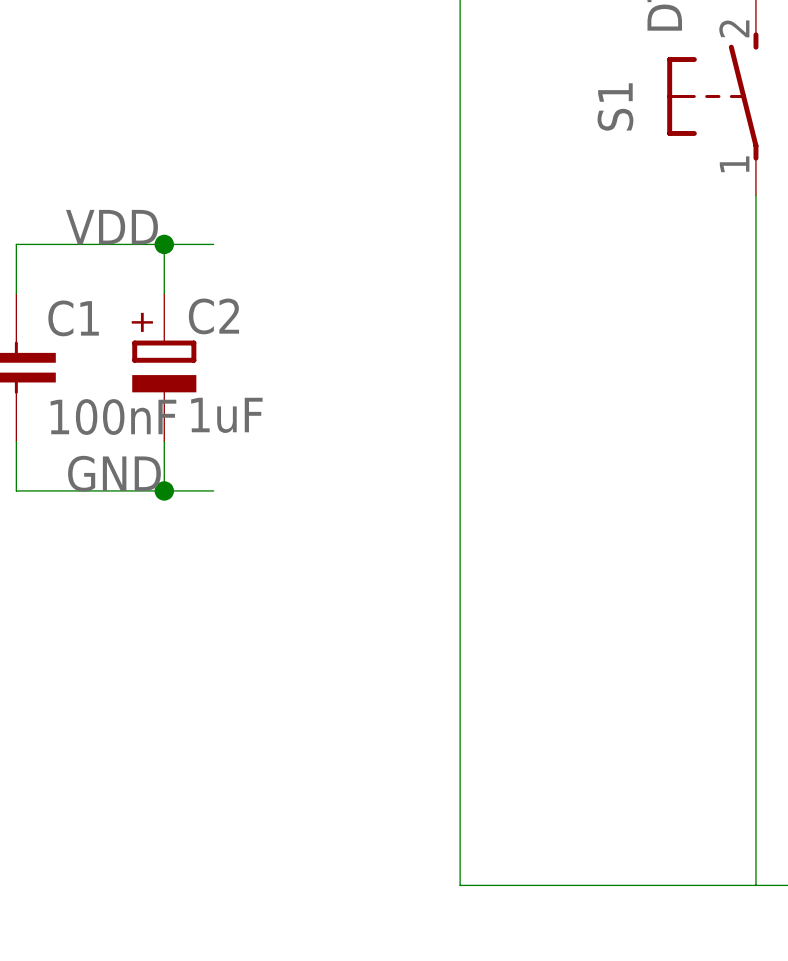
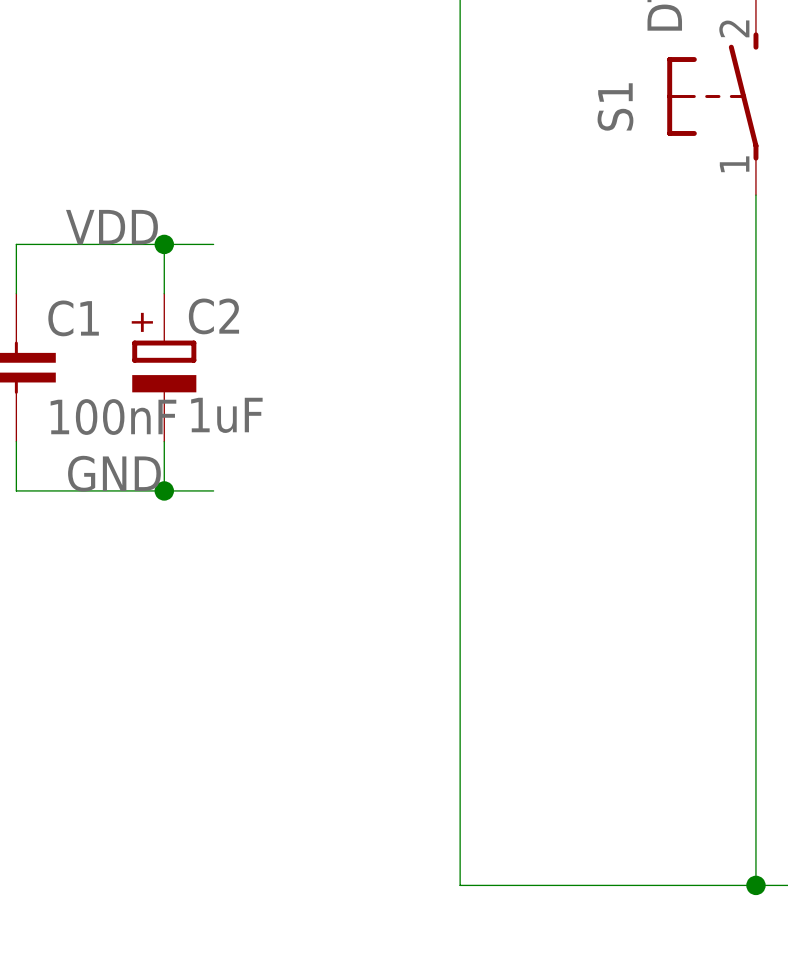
junction: none -> (755, 885)

